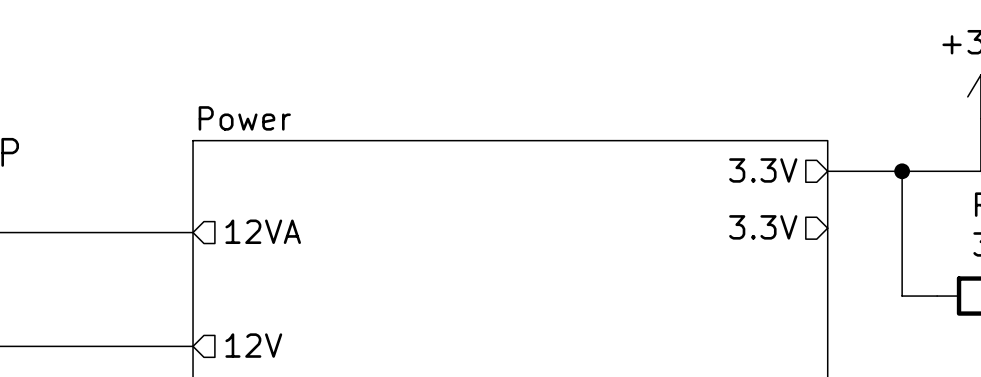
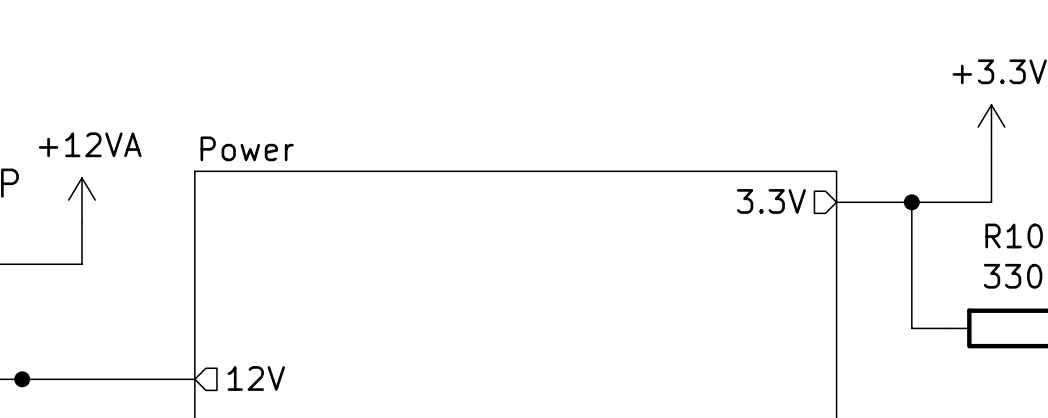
power symbol: none -> +12VA (81, 200)
sheet pin: 3.3V (763, 227) -> none
sheet pin: 12VA (263, 231) -> none
wire: (81, 232) (193, 232) -> (81, 264) (81, 222)
junction: none -> (22, 379)

